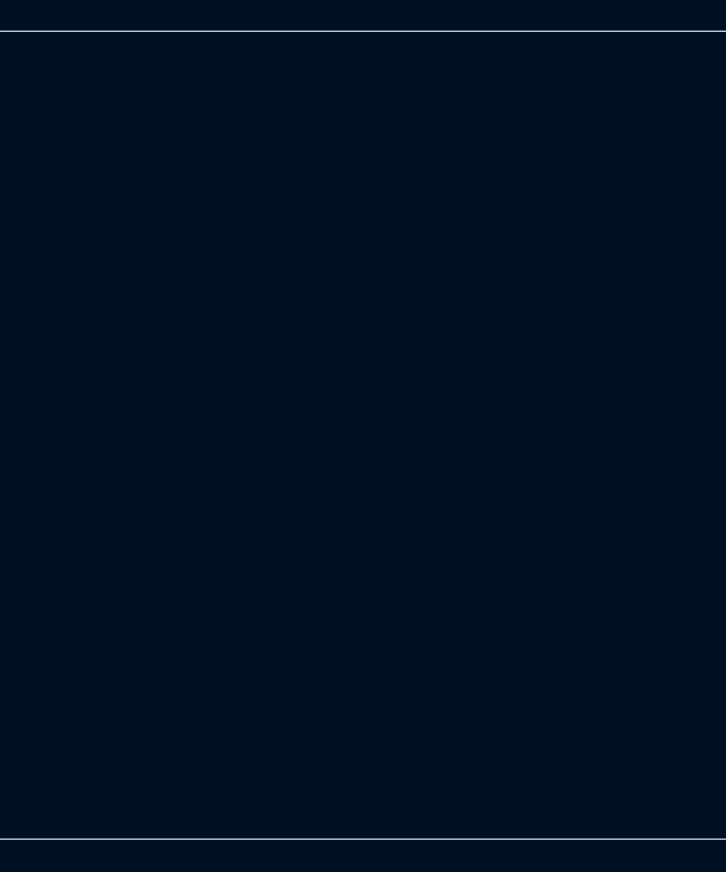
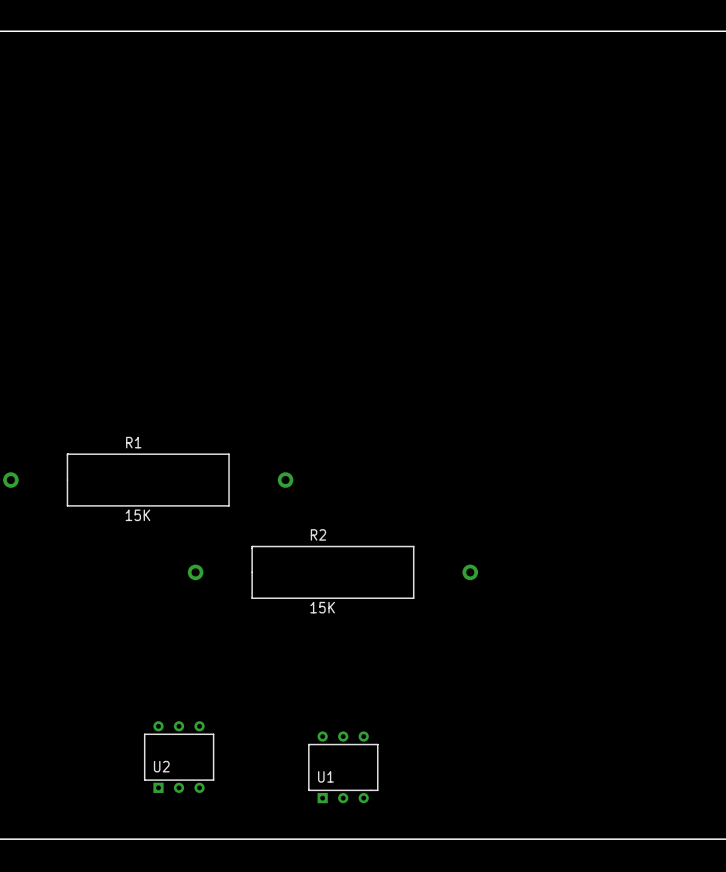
R1: none -> 15K (148, 480)
R2: none -> 15K (332, 572)
U2: none -> (179, 757)
U1: none -> (343, 767)

